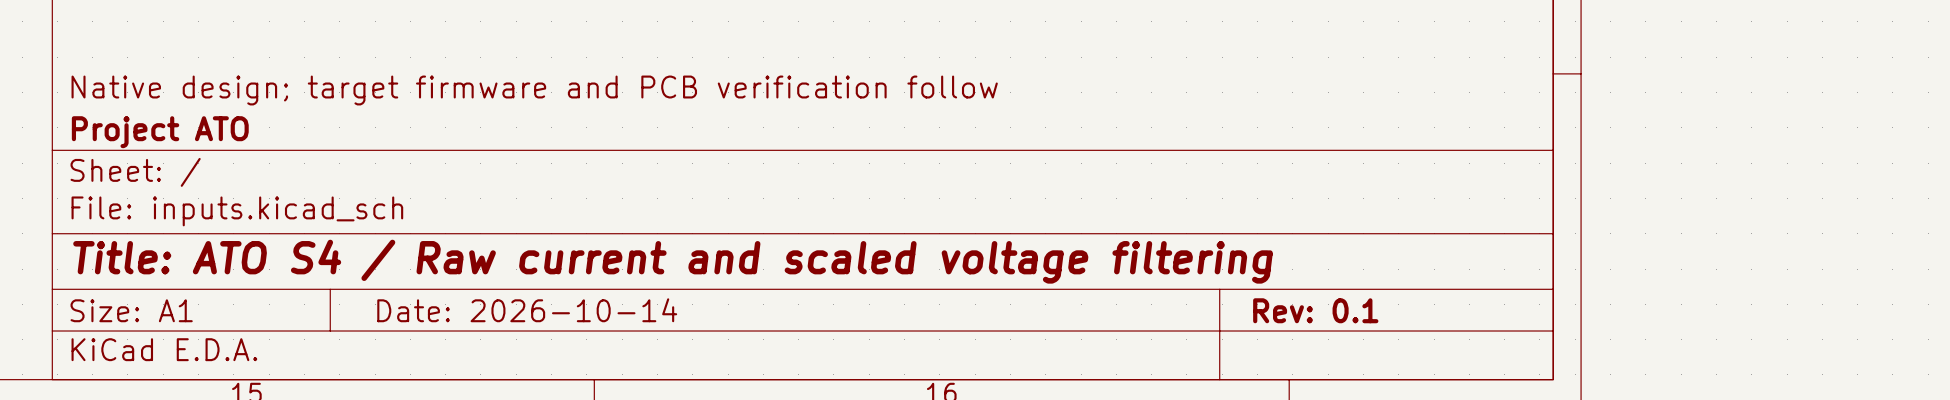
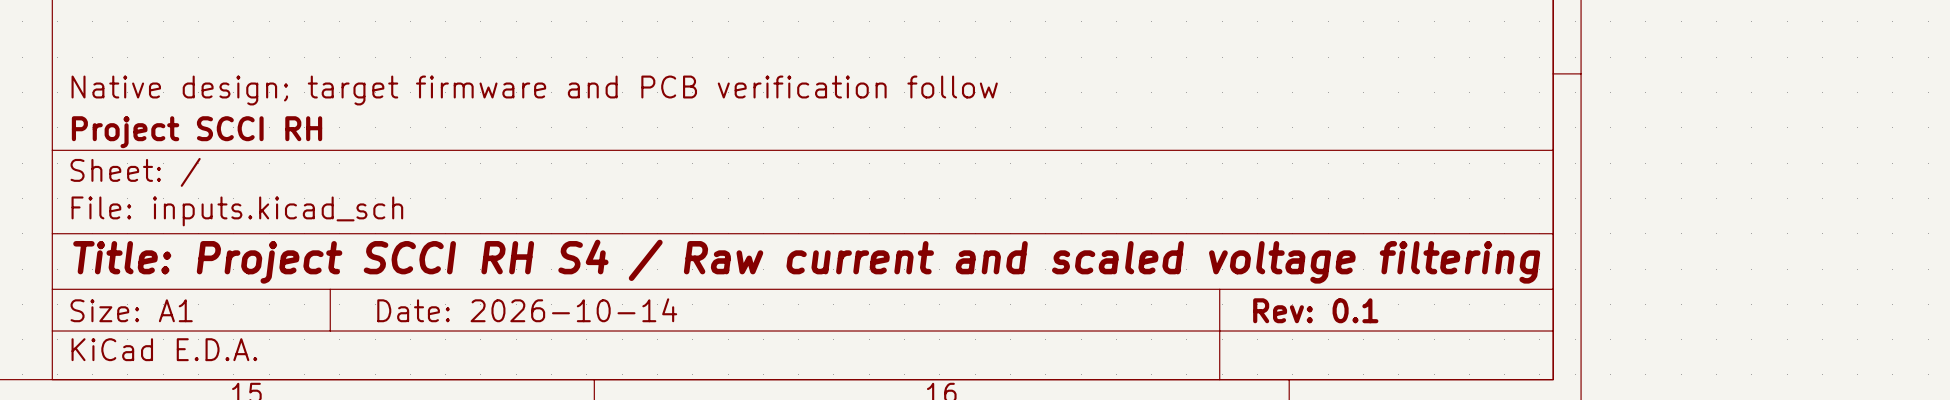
title block: Project ATO (160, 132) -> Project SCCI RH (197, 132)
title block: Title: ATO S4 / Raw current and scaled voltage filtering (673, 261) -> Title: Project SCCI RH S4 / Raw current and scaled voltage filtering (806, 261)

